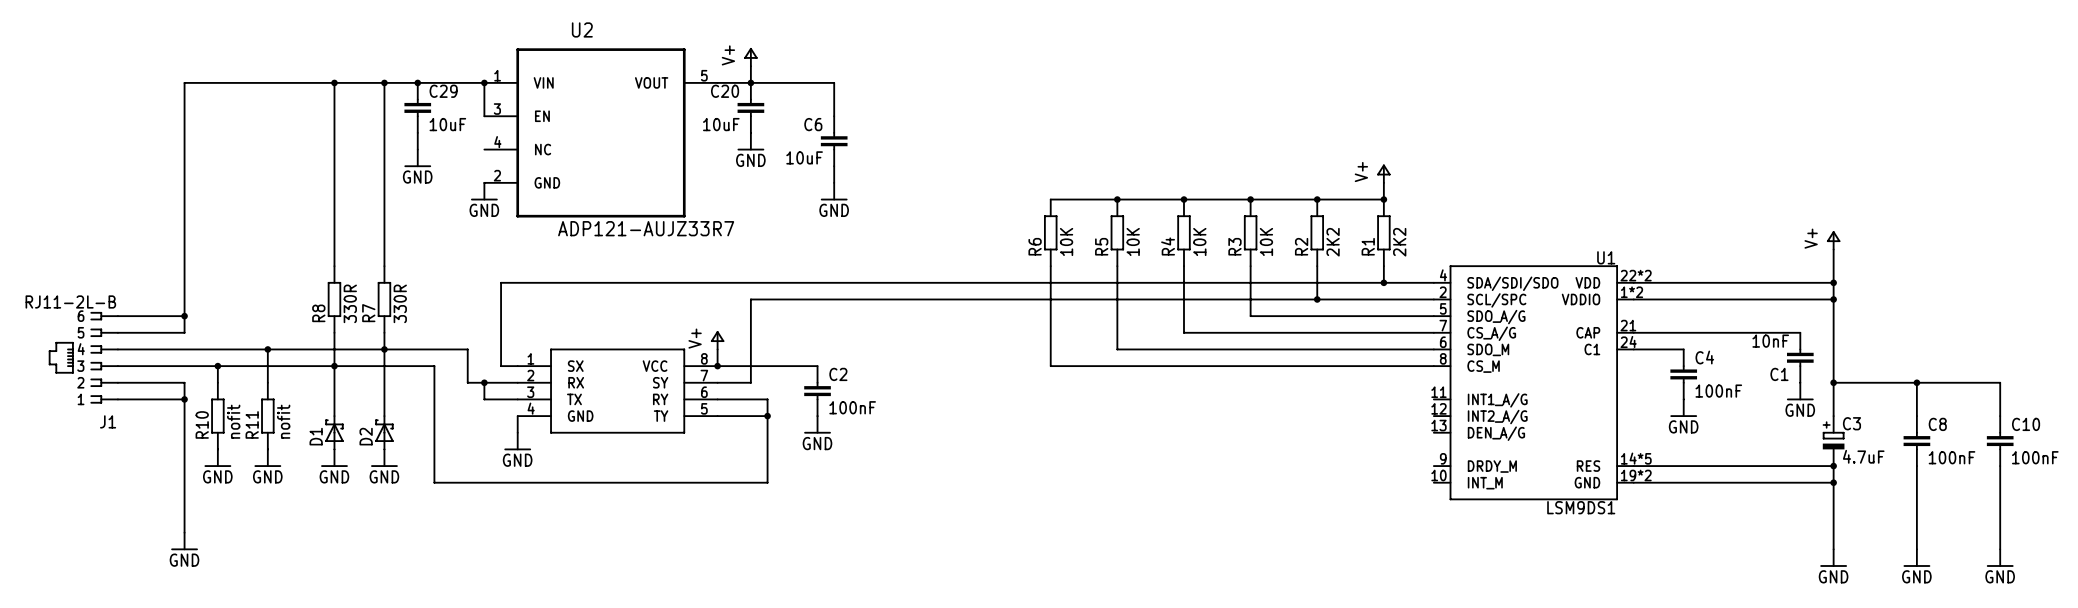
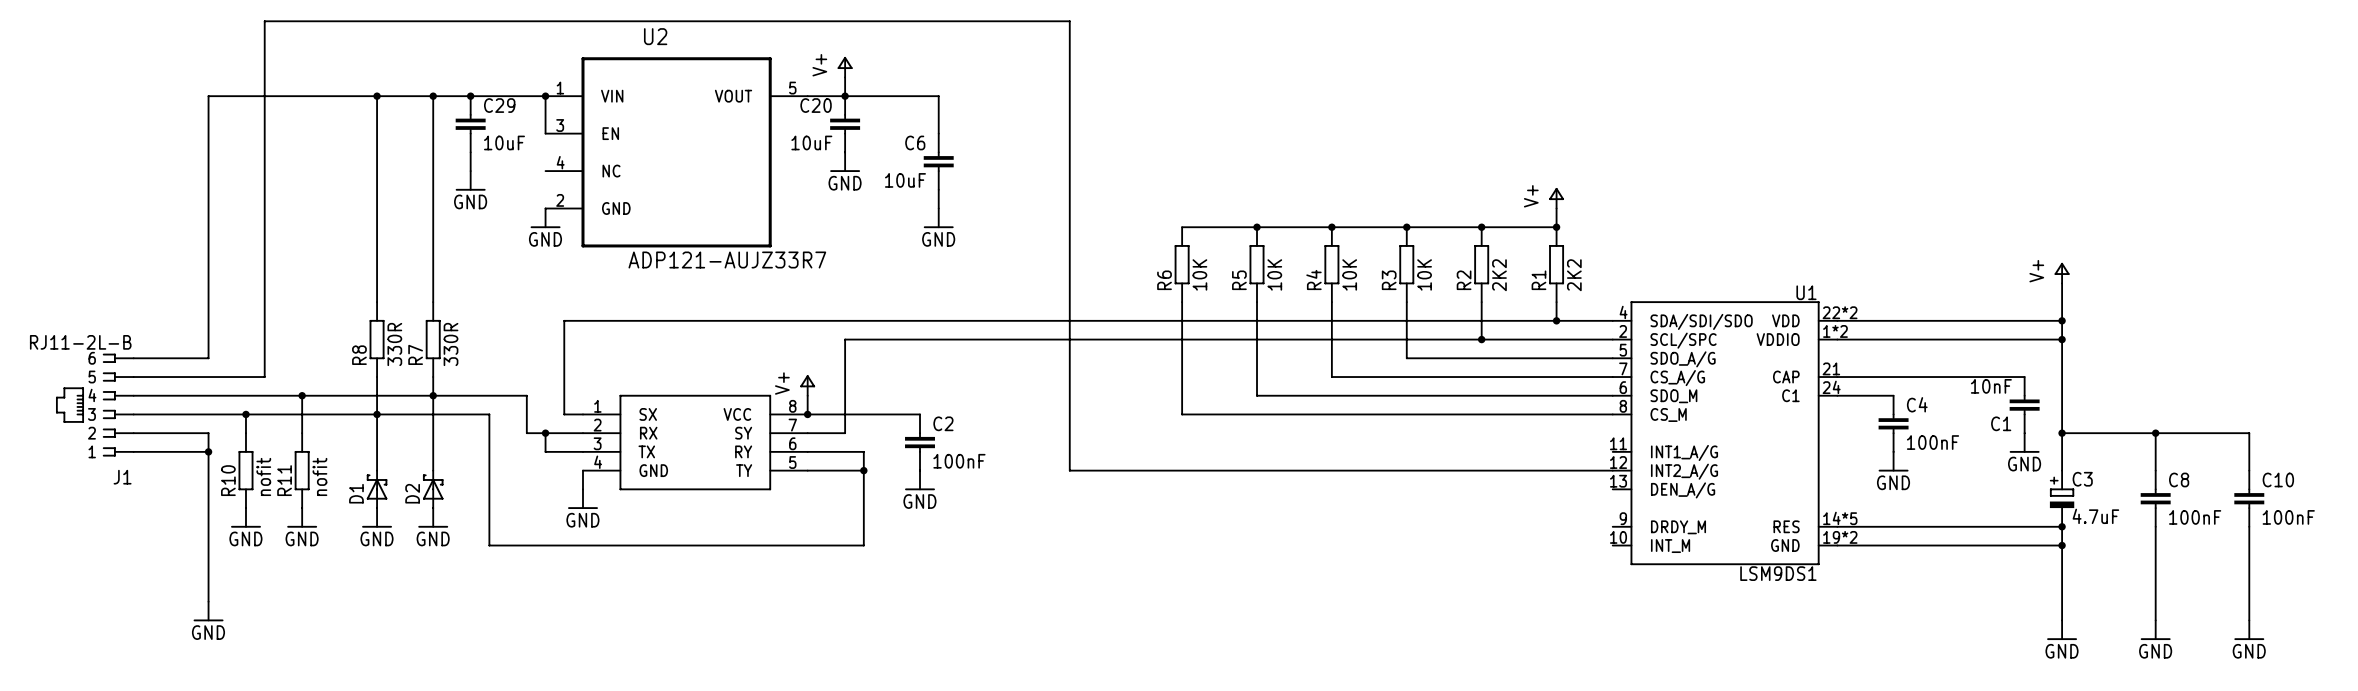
wire: (184, 316) (184, 332) -> (1612, 470) (1069, 470) (1069, 21) (264, 21) (264, 377) (208, 377)
junction: (184, 316) -> none

